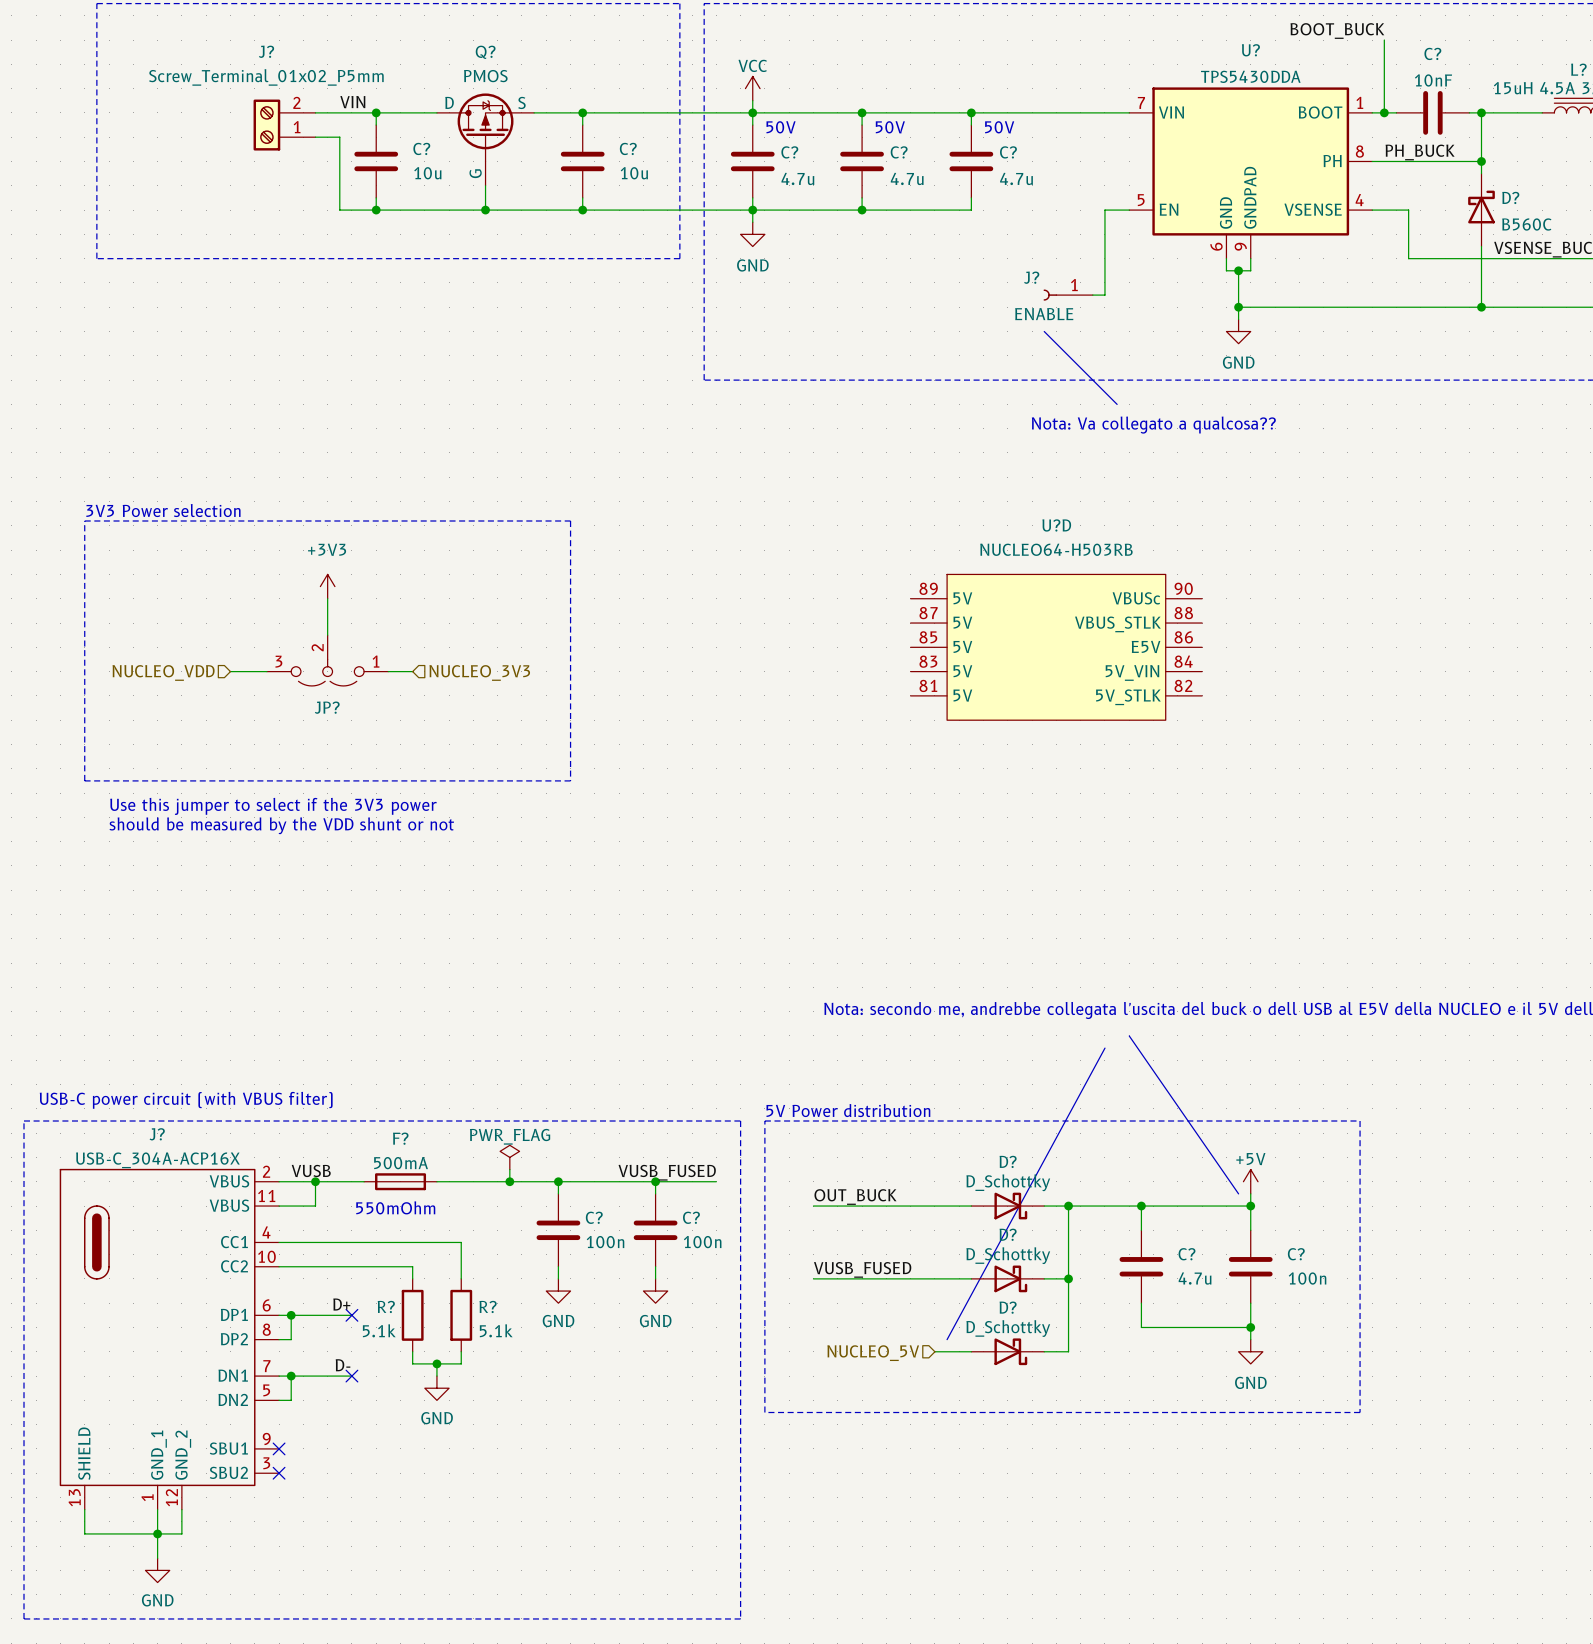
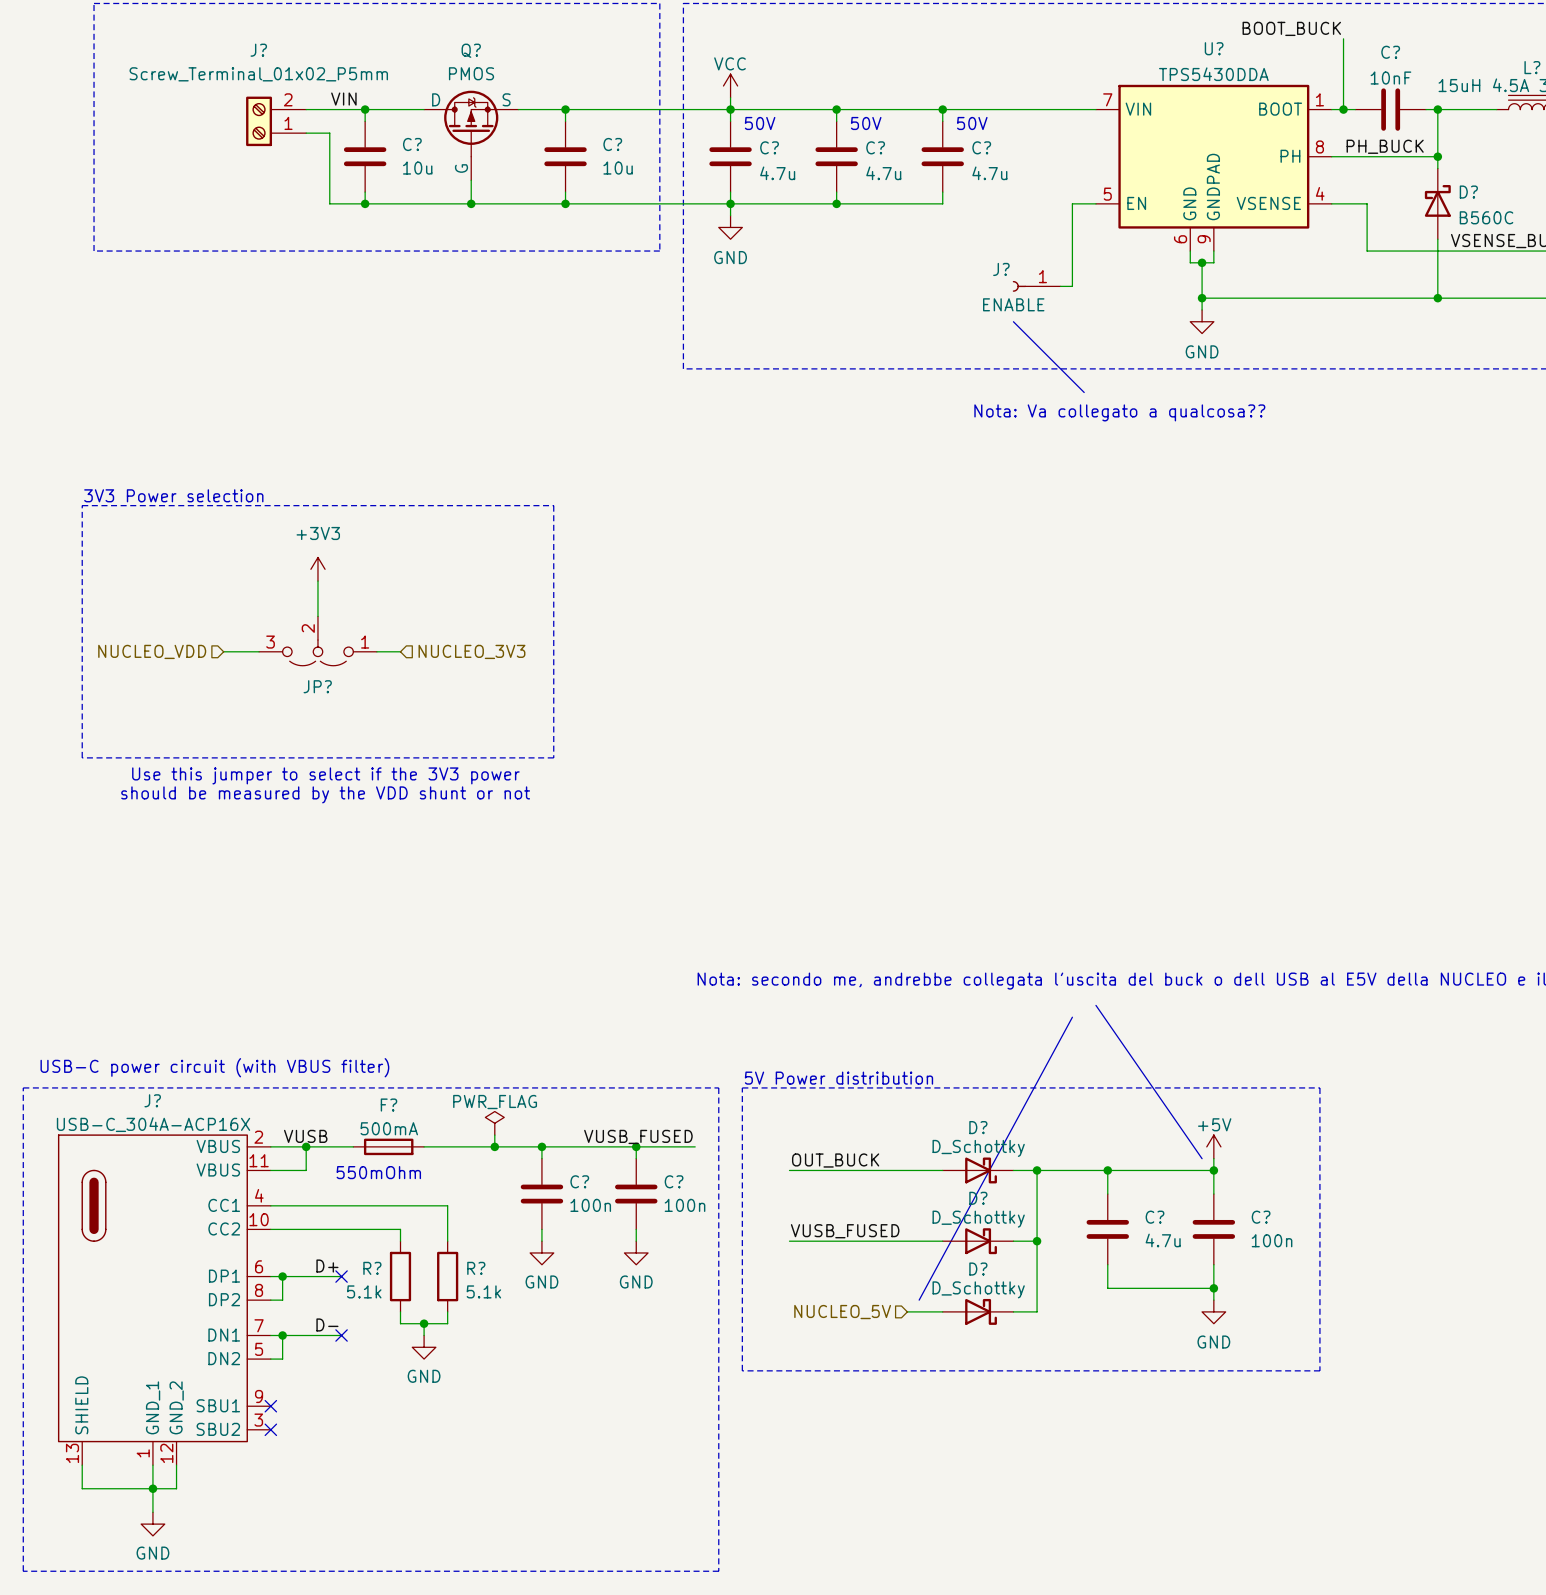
U?D: NUCLEO64-H503RB (1056, 647) -> none
text position: Use this jumper to select if the 3V3 power (273, 806) -> Use this jumper to select if the 3V3 power (325, 775)
text position: should be measured by the VDD shunt or not (281, 825) -> should be measured by the VDD shunt or not (325, 794)

